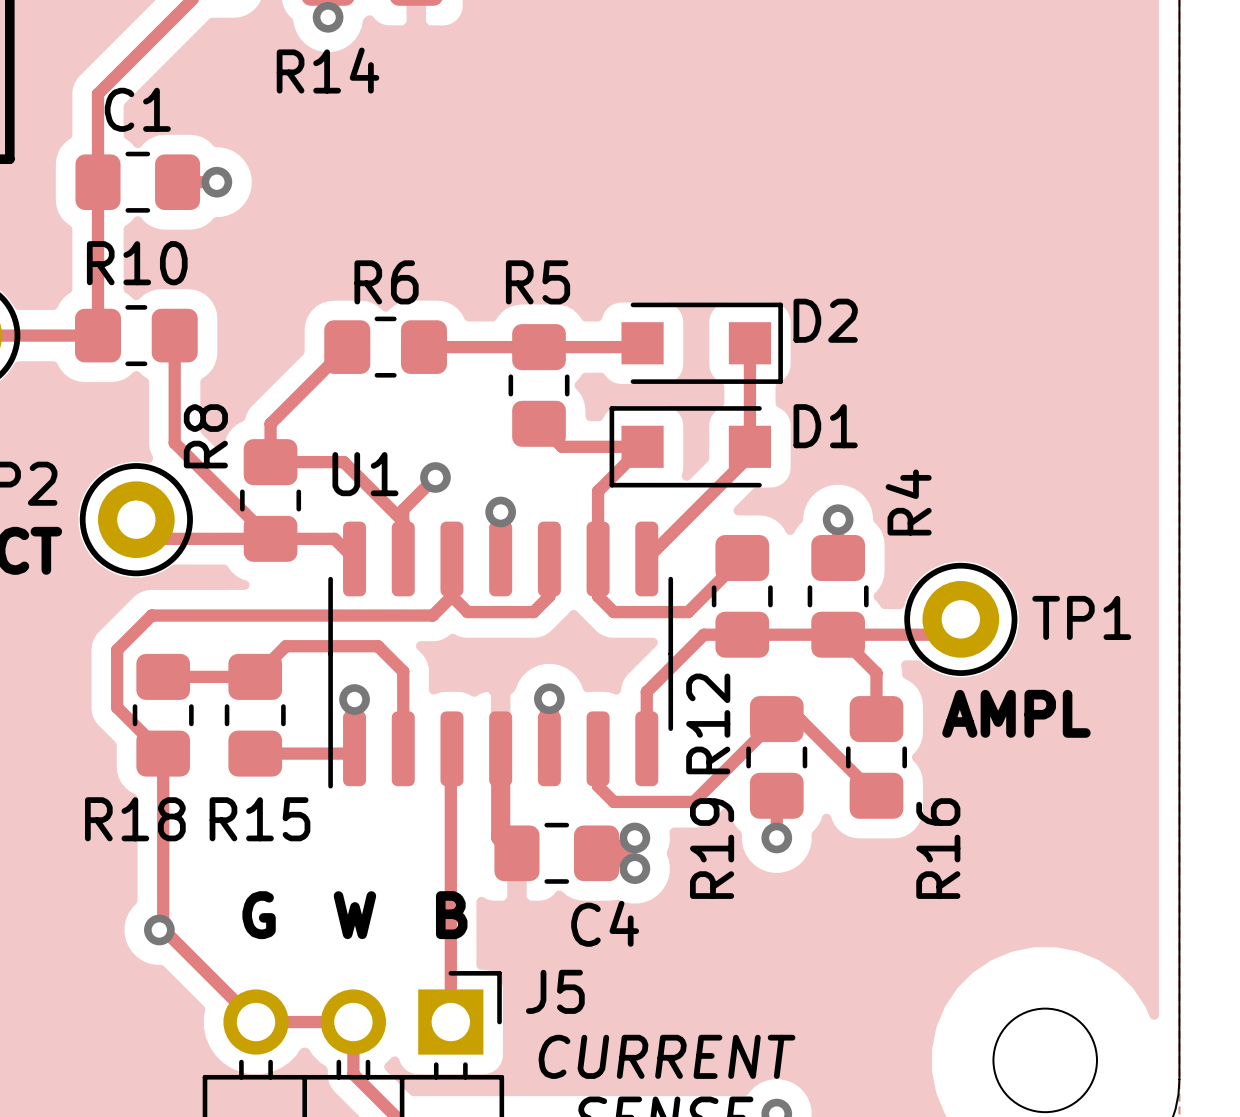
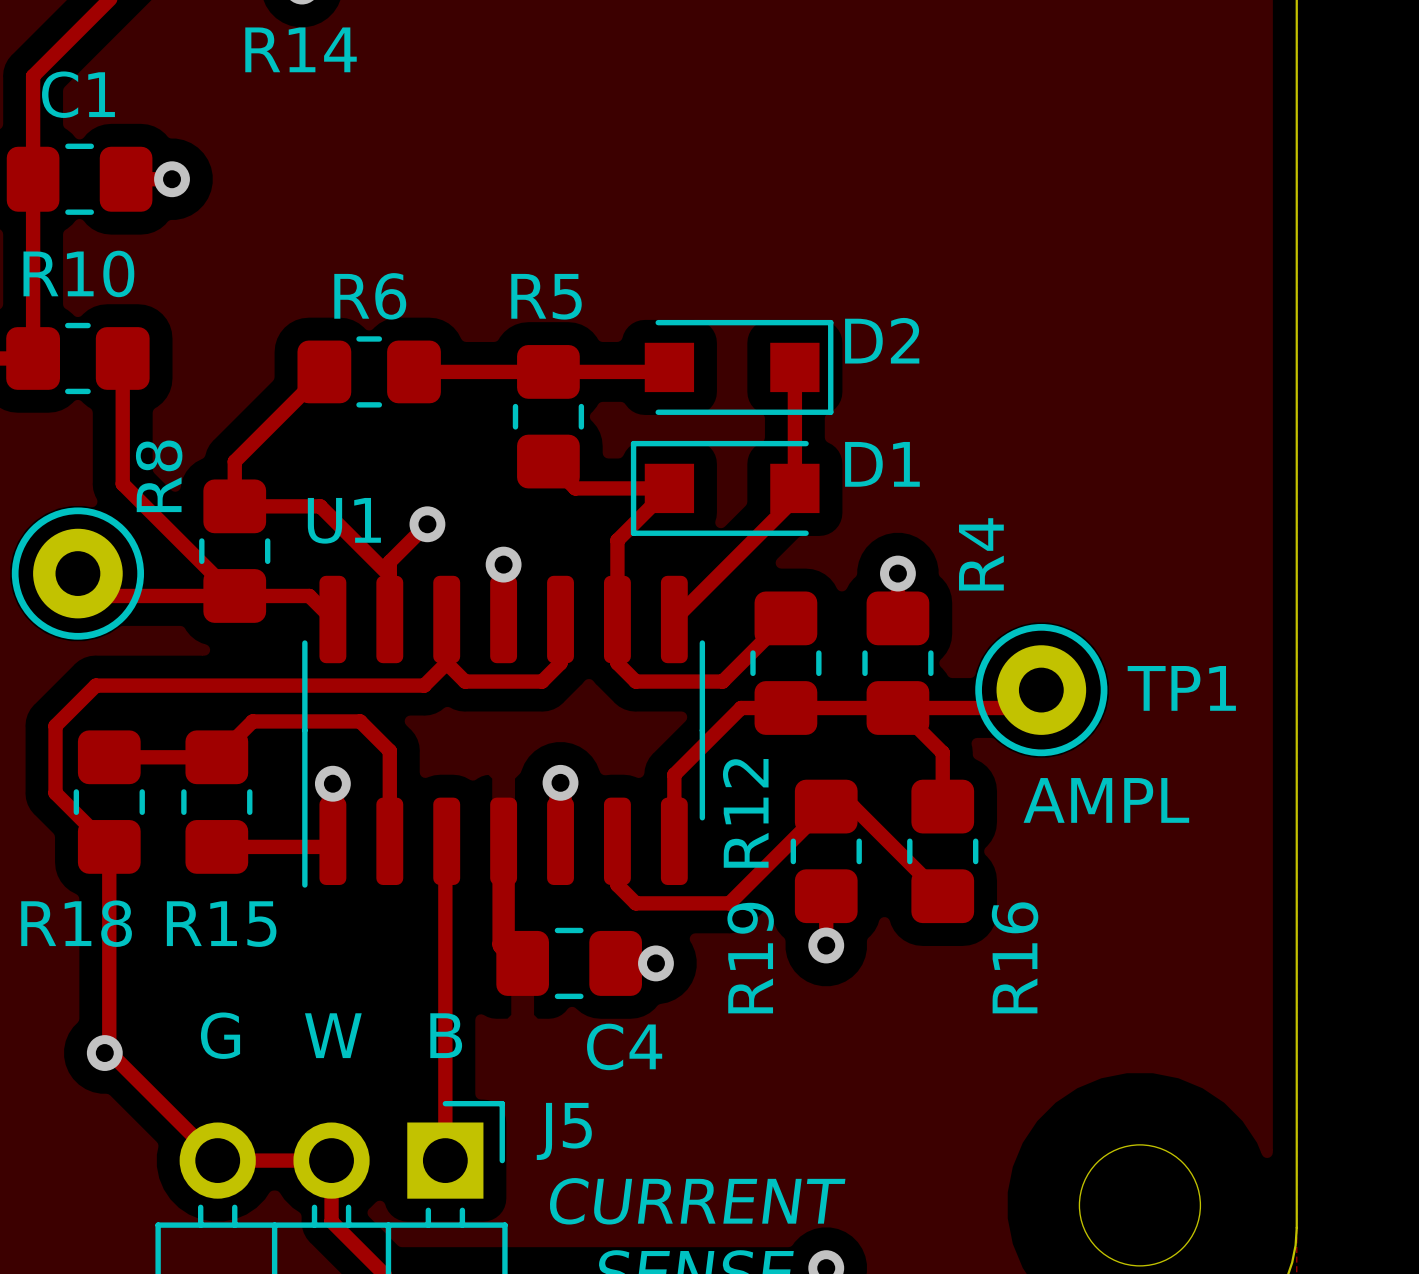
via: (634, 837) -> none
via: none -> (655, 963)
via: (634, 868) -> none

